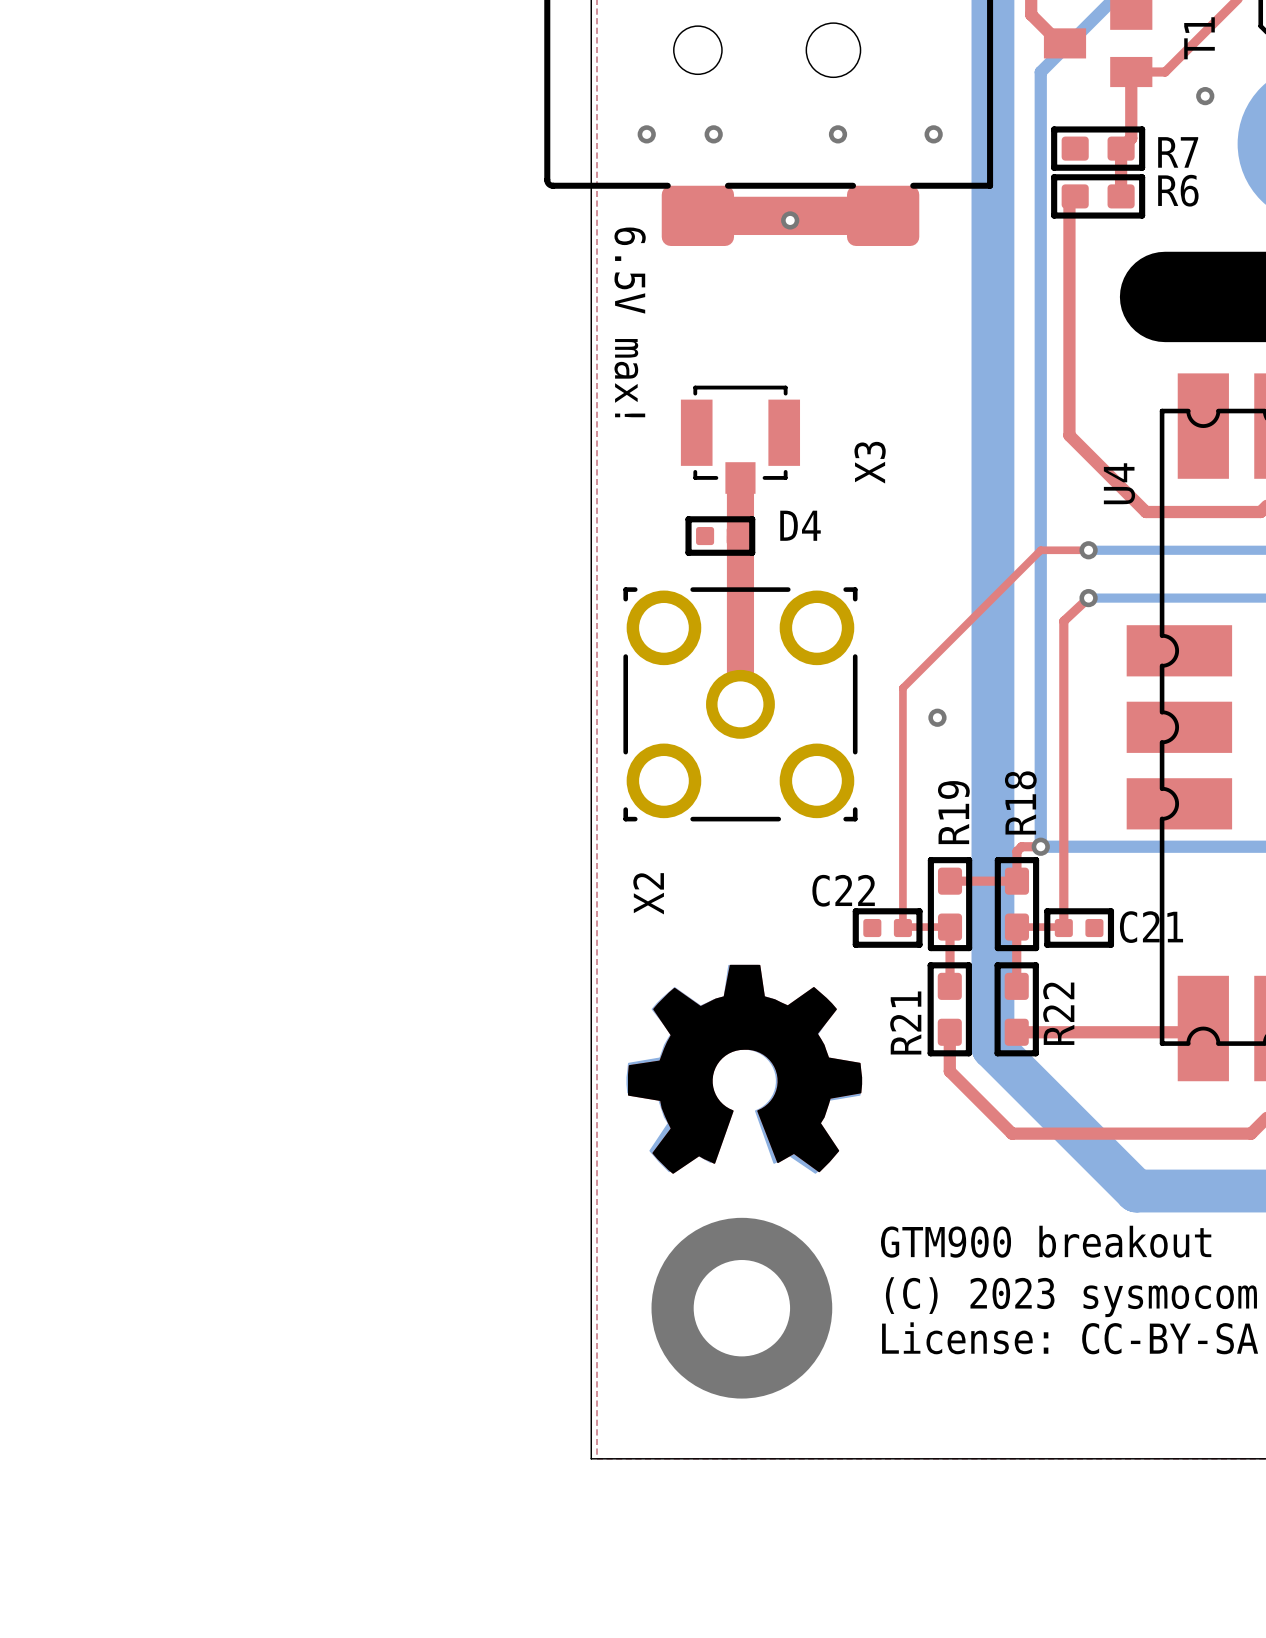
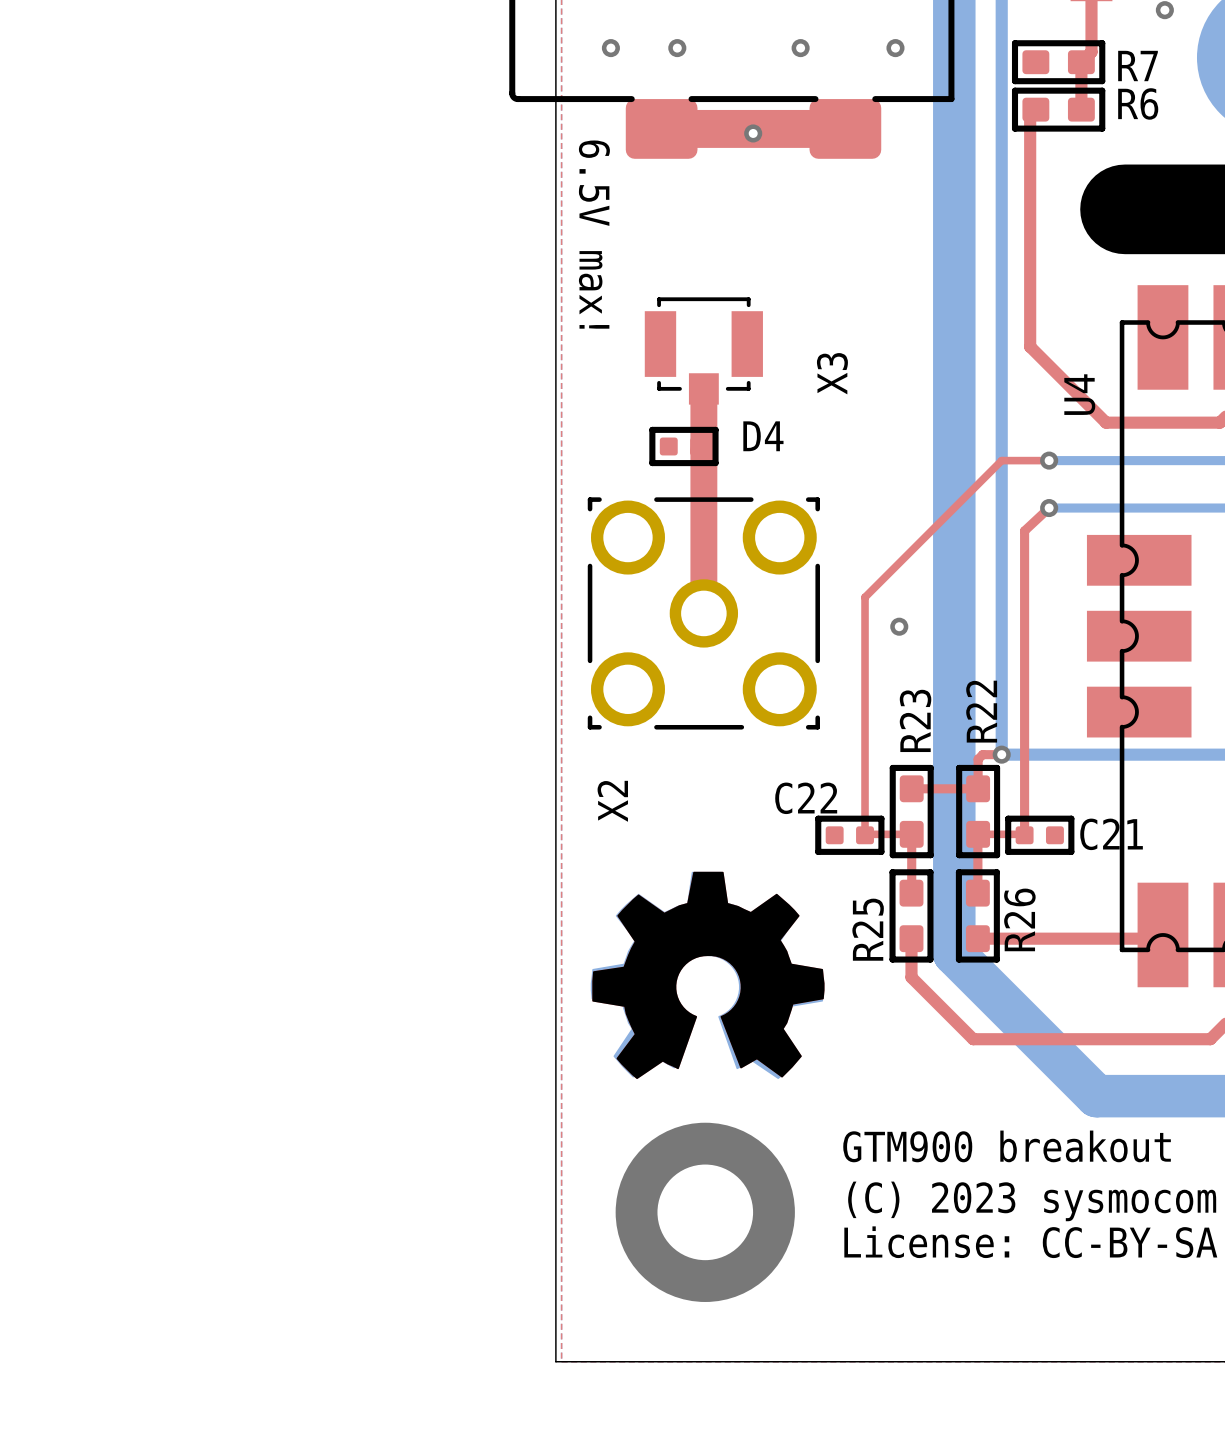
R18 name: R18 (1020, 802) -> R22 (981, 711)
R19 name: R19 (953, 812) -> R23 (915, 720)
R22 name: R22 (1058, 1013) -> R26 (1019, 919)
R21 name: R21 (905, 1022) -> R25 (868, 929)

